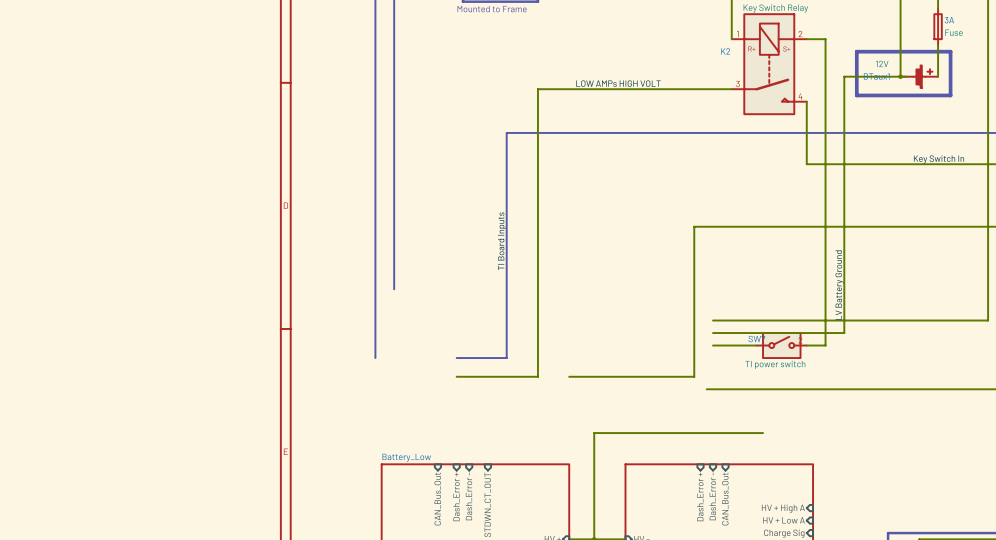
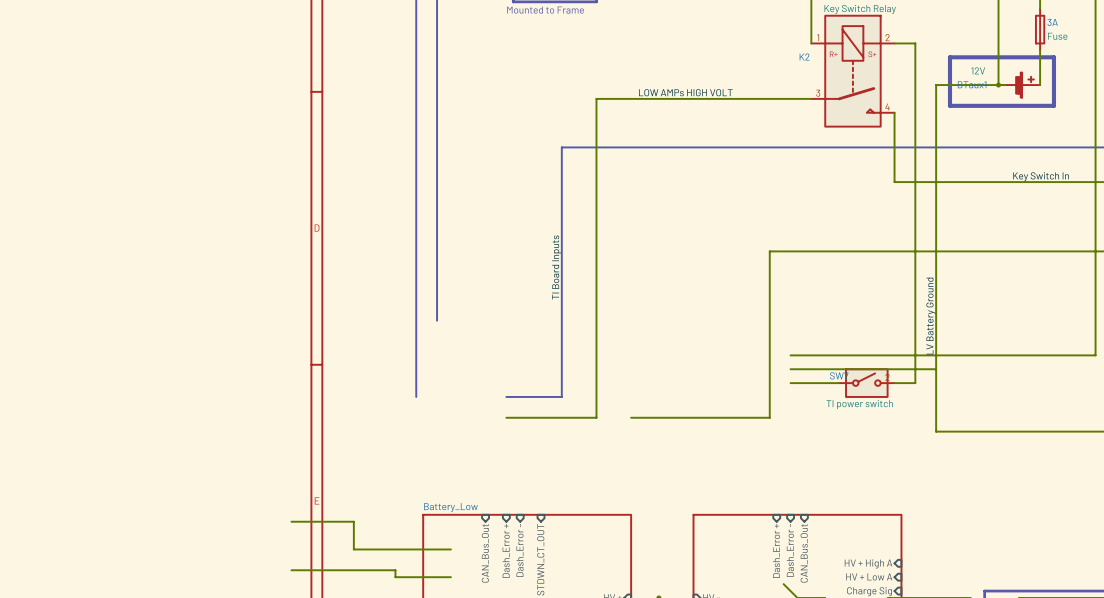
wire: (706, 389) (844, 389) -> (936, 369) (936, 431)
wire: (763, 433) (594, 433) (594, 539) -> none
wire: none -> (291, 521) (353, 521) (353, 549) (450, 549)
wire: none -> (291, 570) (395, 570) (395, 577) (450, 577)
wire: none -> (783, 584) (797, 597) (825, 597)
wire: (569, 539) (625, 539) -> none
wire: none -> (887, 597) (970, 597)

